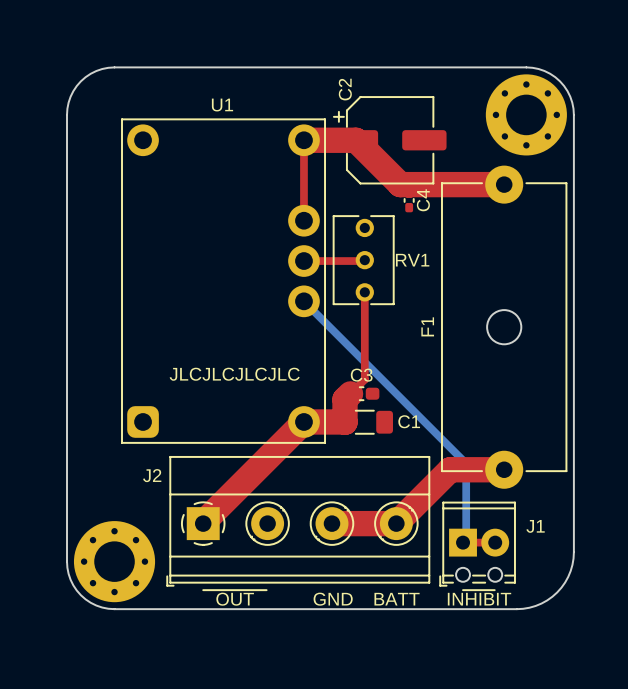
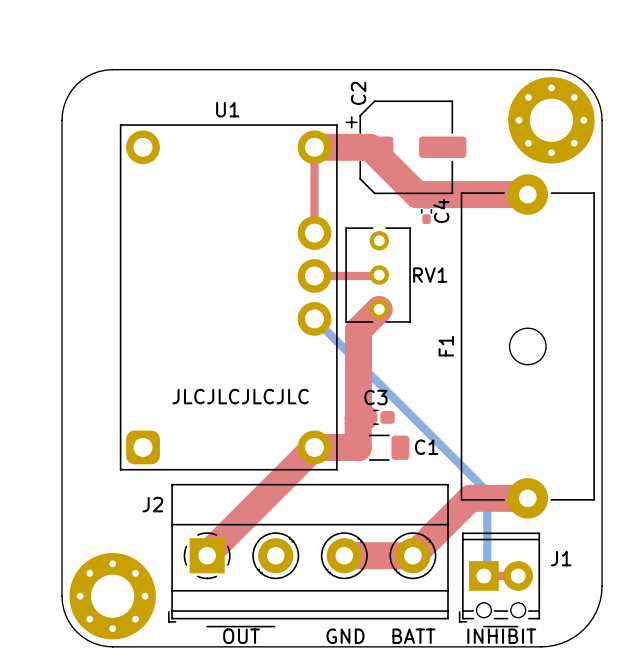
top track: (364, 292) (364, 379) (350, 393) -> (379, 309) (358, 330) (358, 423)

